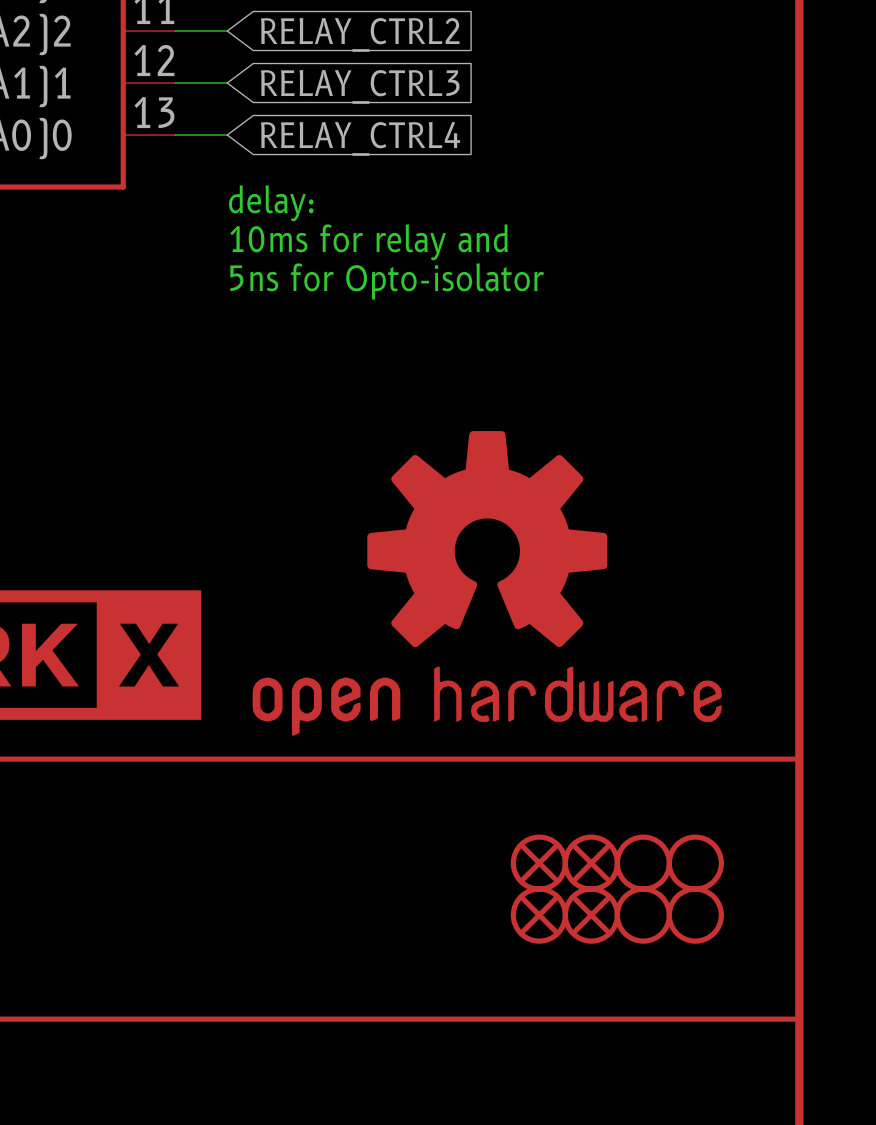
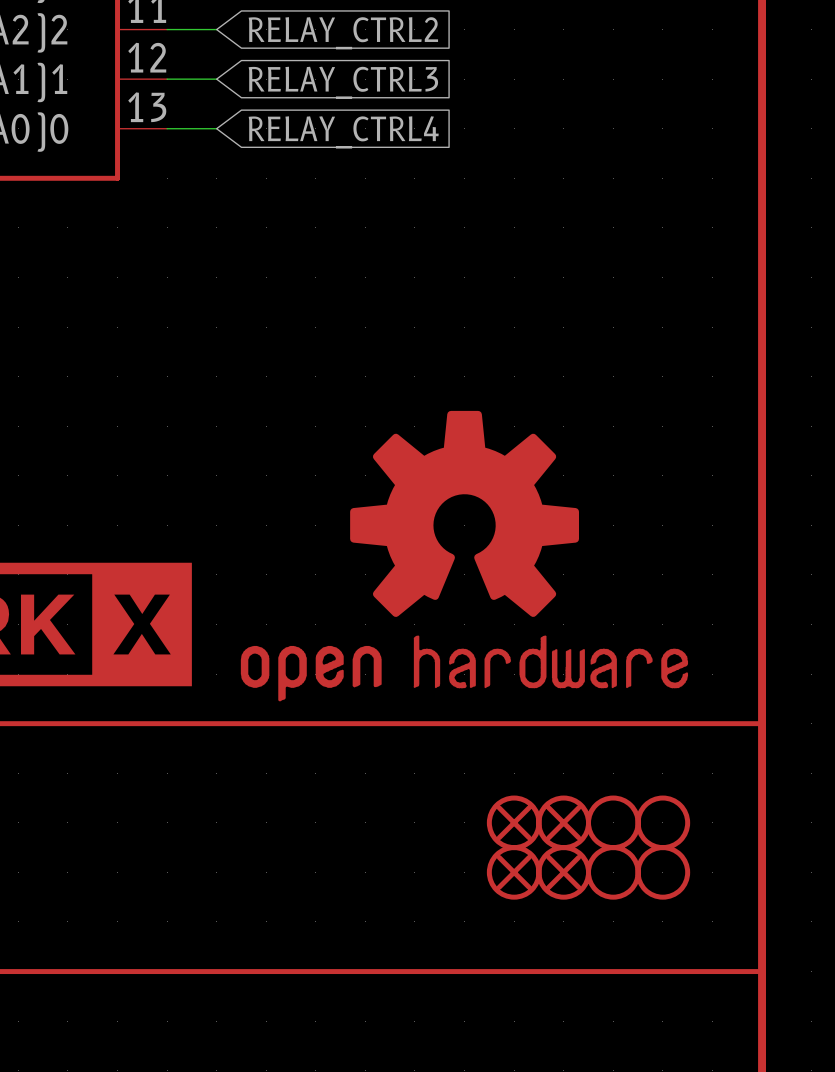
text: delay: (271, 203) -> none
text: 10ms for relay and (369, 242) -> none
text: 5ns for Opto-isolator (387, 281) -> none

